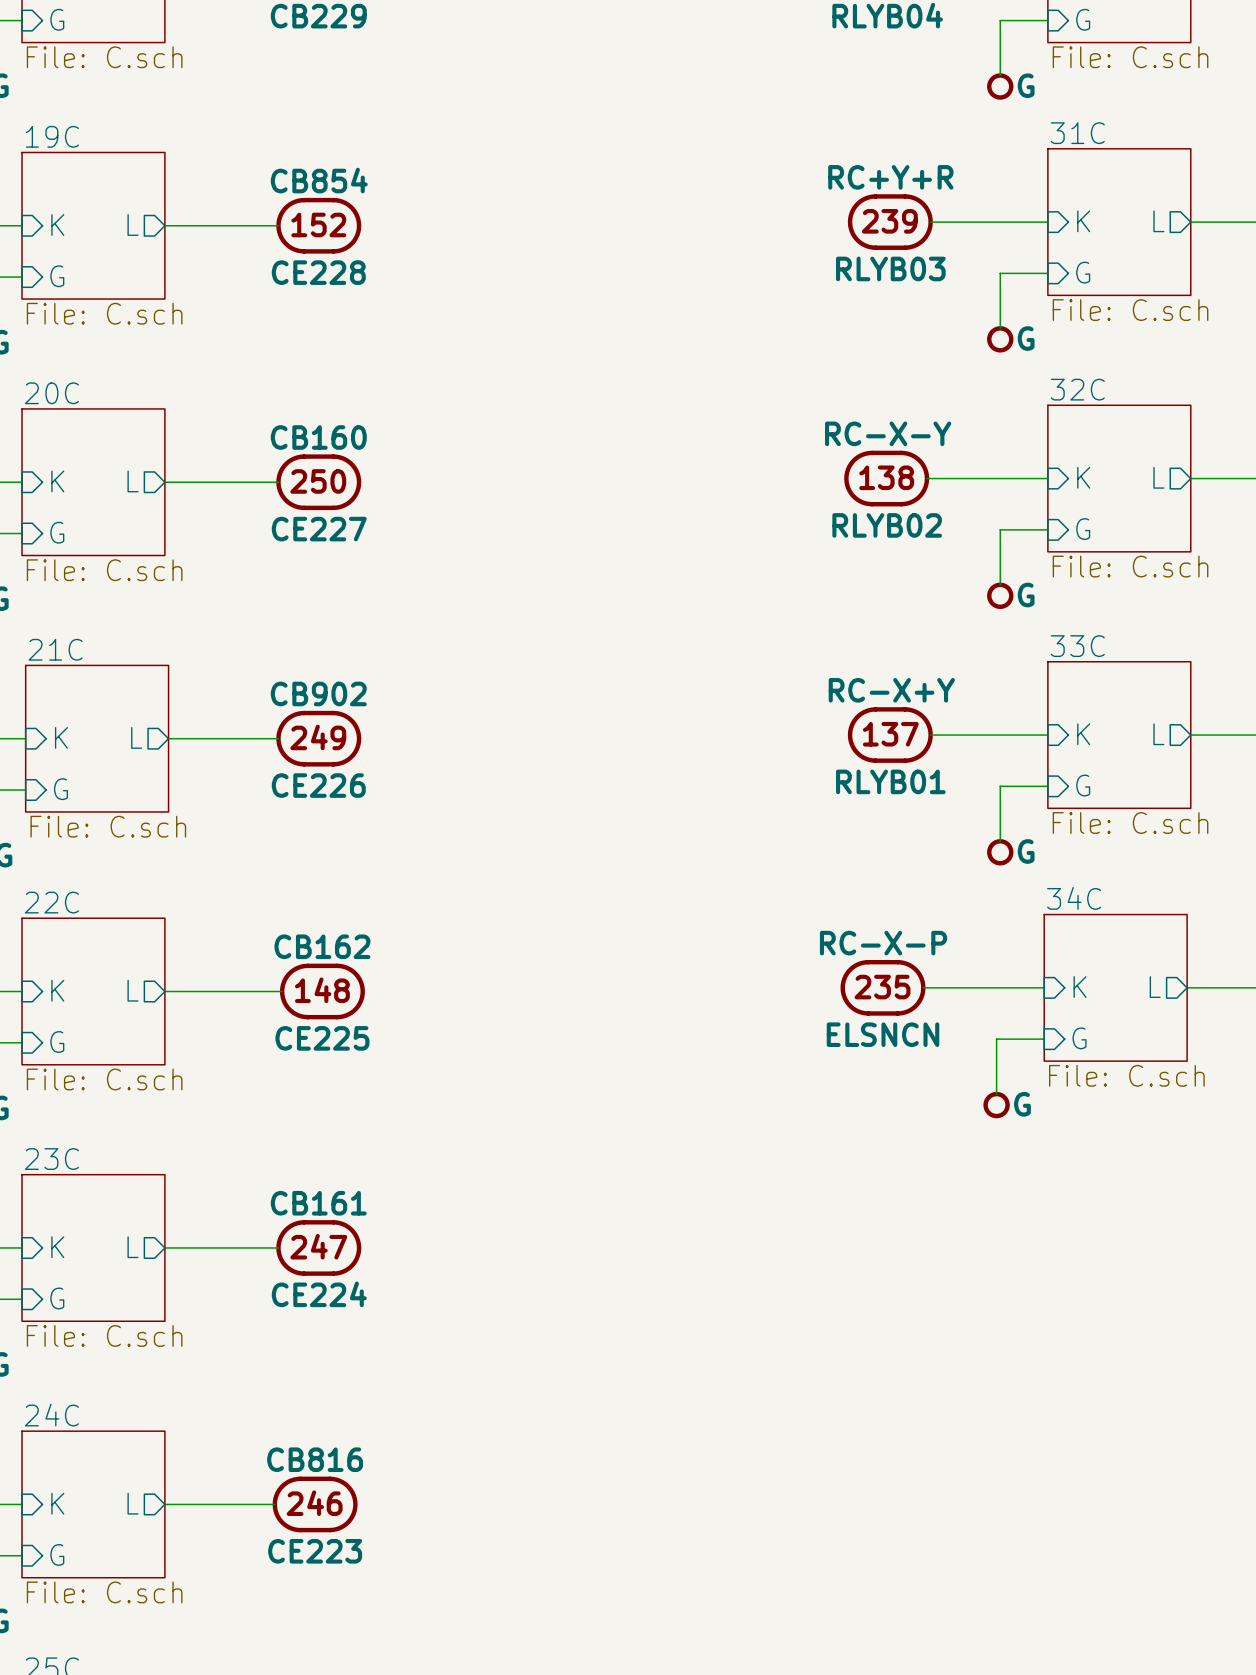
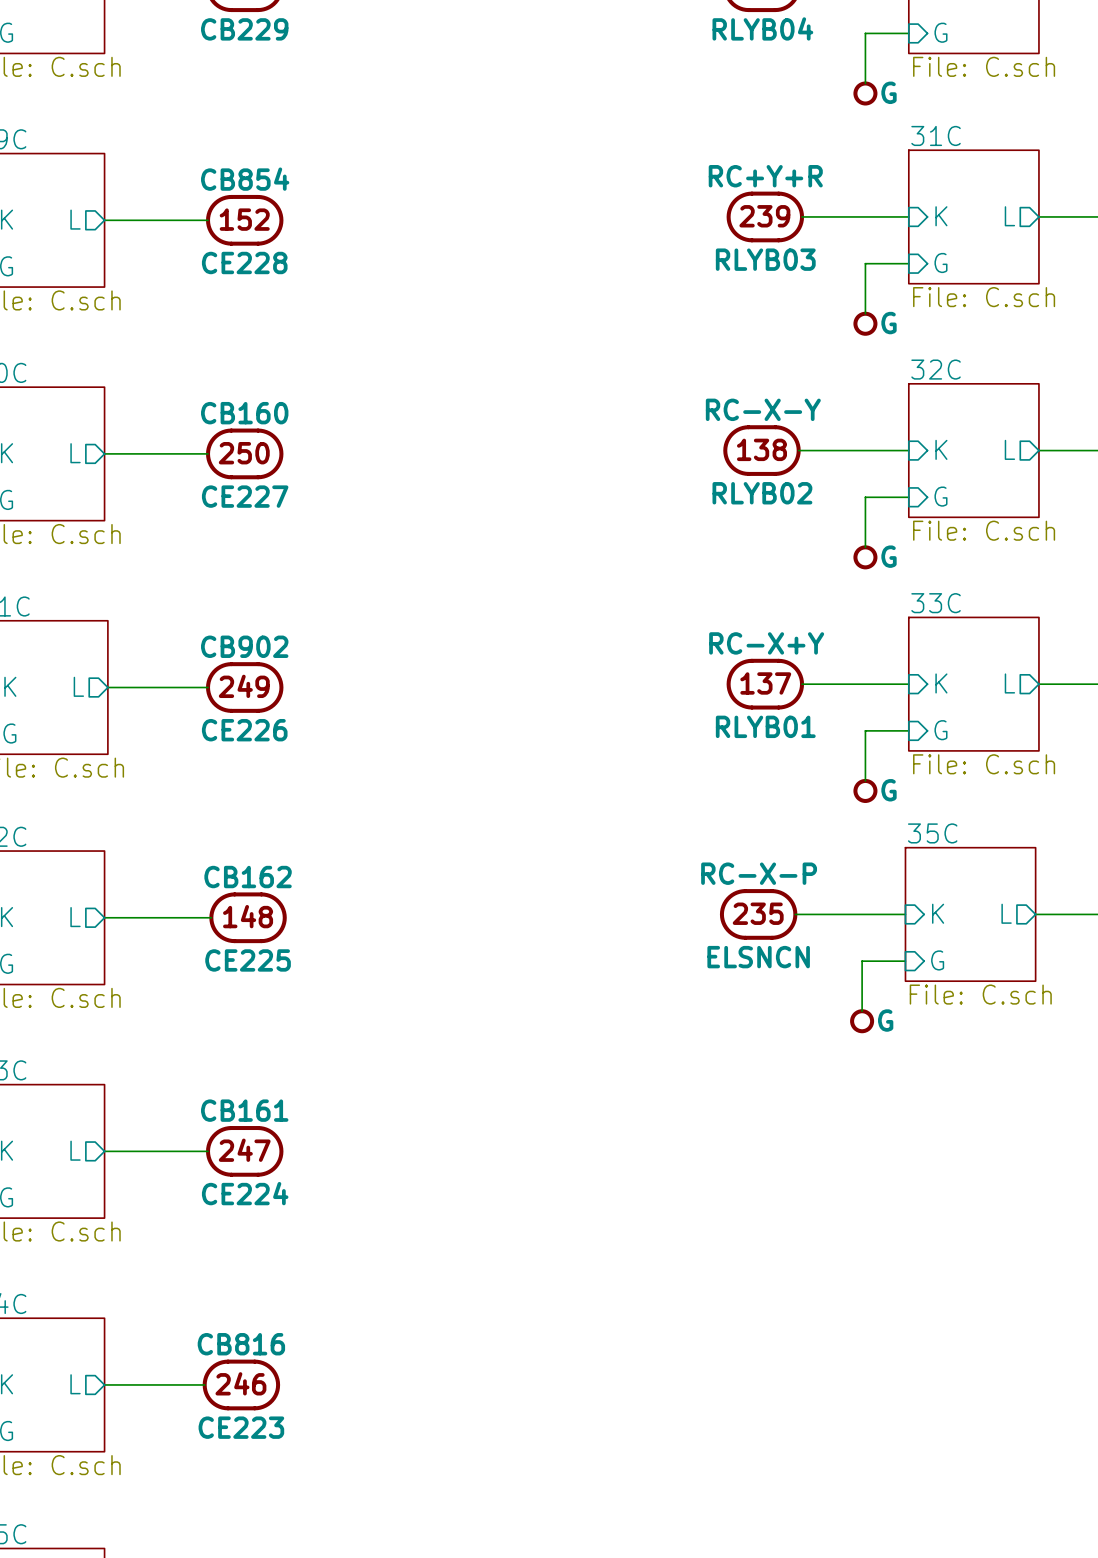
sheet 34C name: 34C (1074, 898) -> 35C (932, 833)

